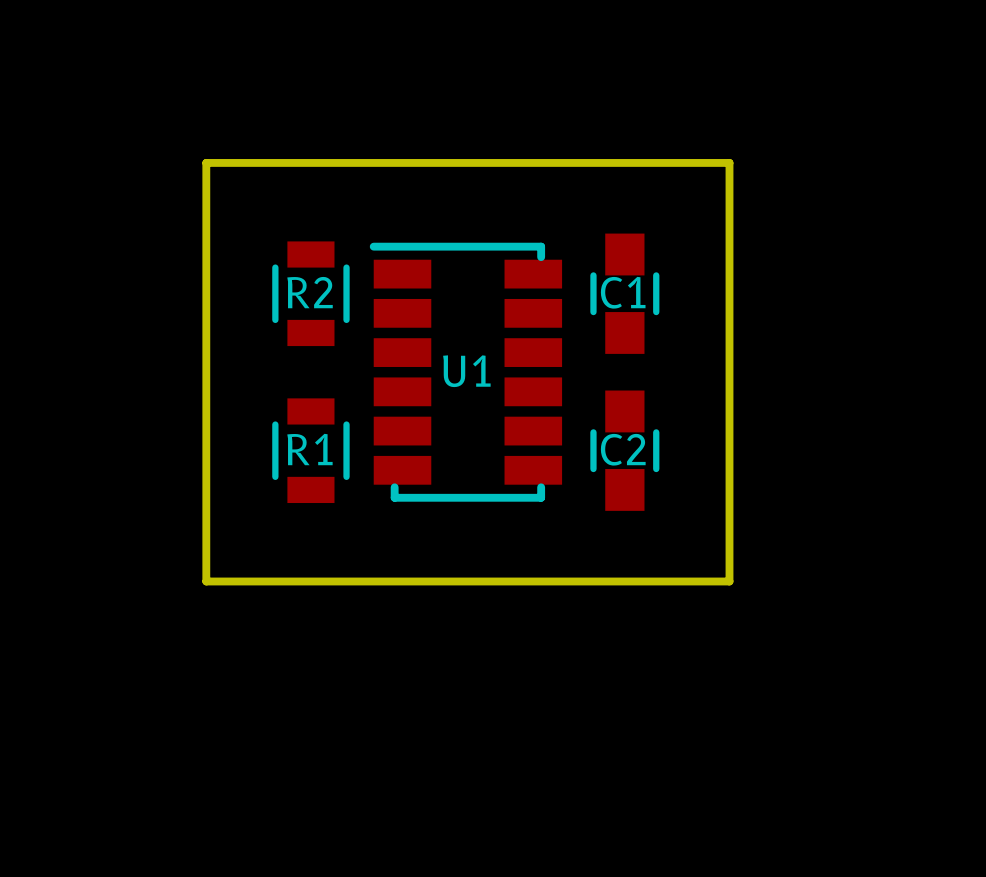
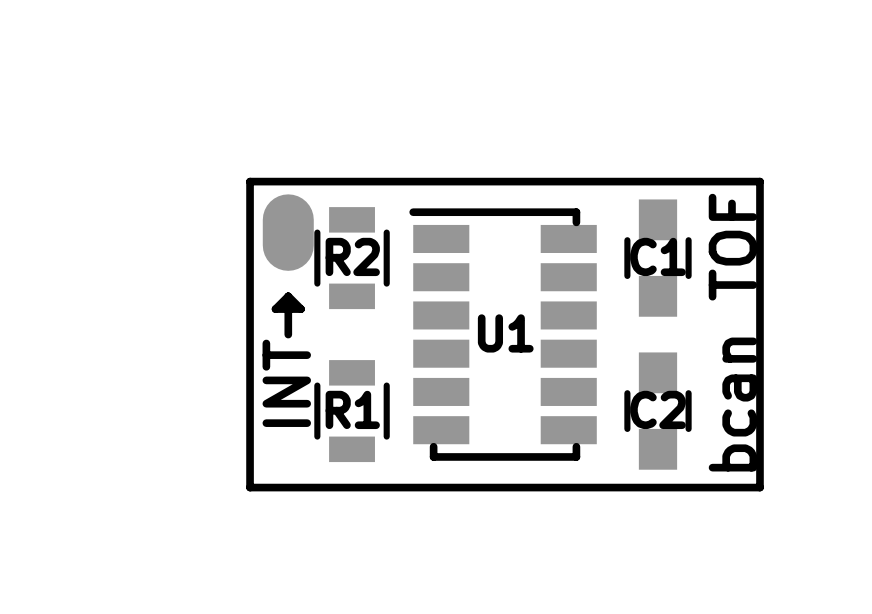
board edge: (206, 215) (206, 162) (729, 162) (729, 215) -> (250, 181) (759, 181)
part: none -> (288, 232)
line: none -> (288, 296) (301, 309) (275, 309) (288, 296)
line: none -> (288, 296) (288, 334)
text: none -> bcan TOF (732, 332)
text: none -> INT (286, 383)
board edge: (206, 529) (206, 581) (729, 581) (729, 529) -> (250, 487) (759, 487)

